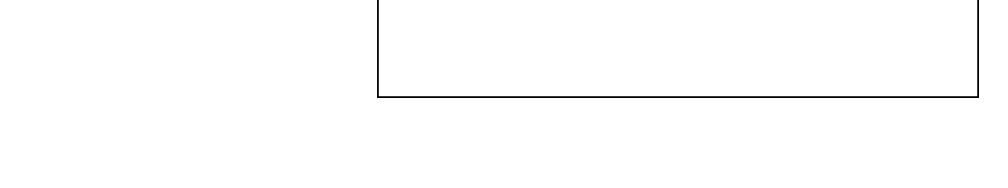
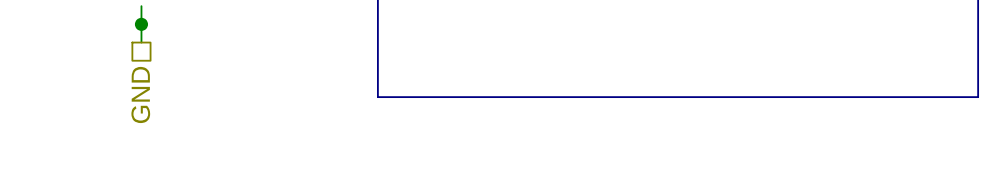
wire: none -> (141, 6) (141, 42)
junction: none -> (141, 24)
hierarchical label: none -> GND (140, 94)

